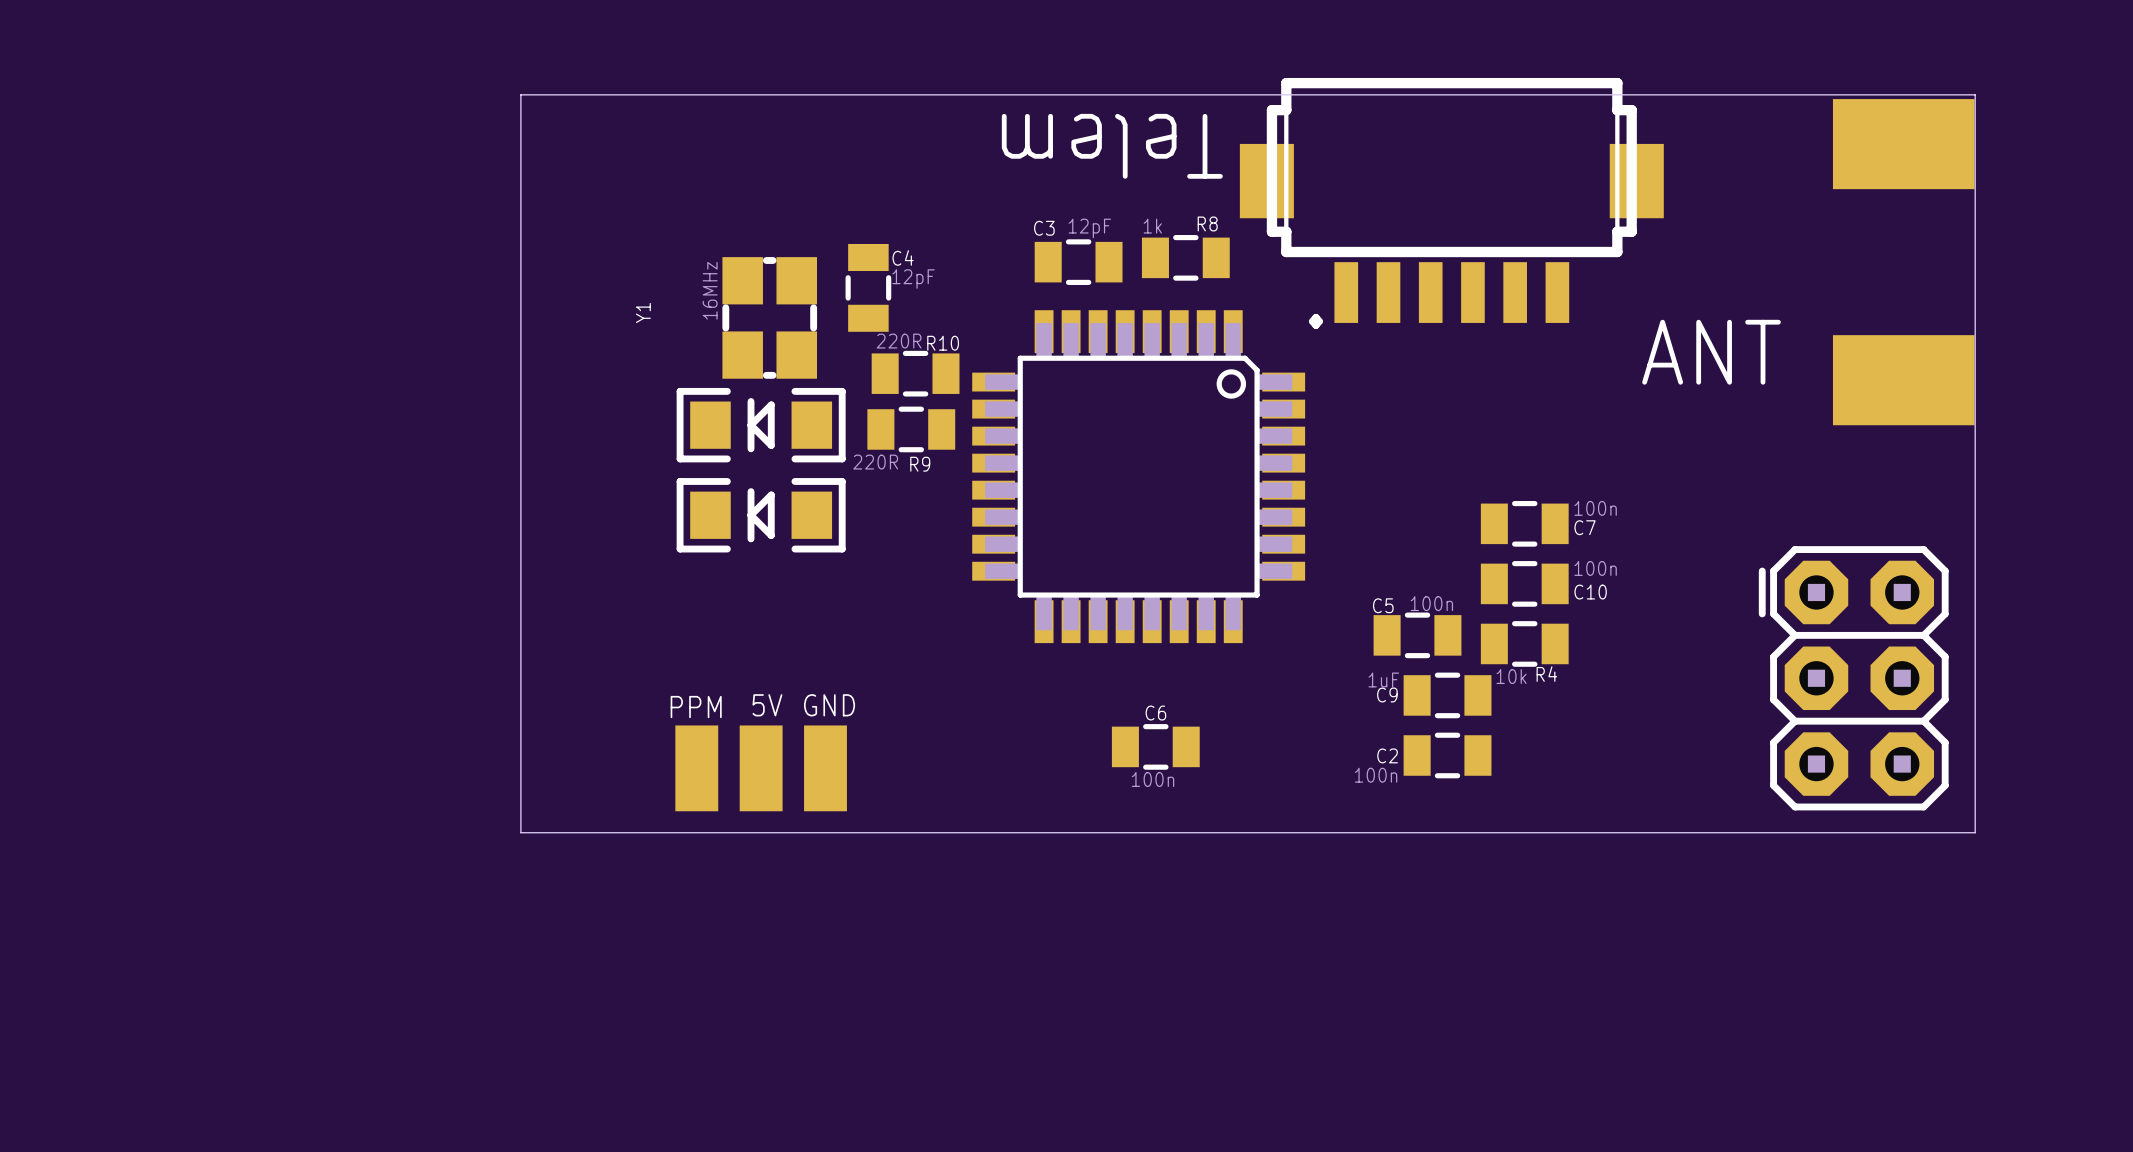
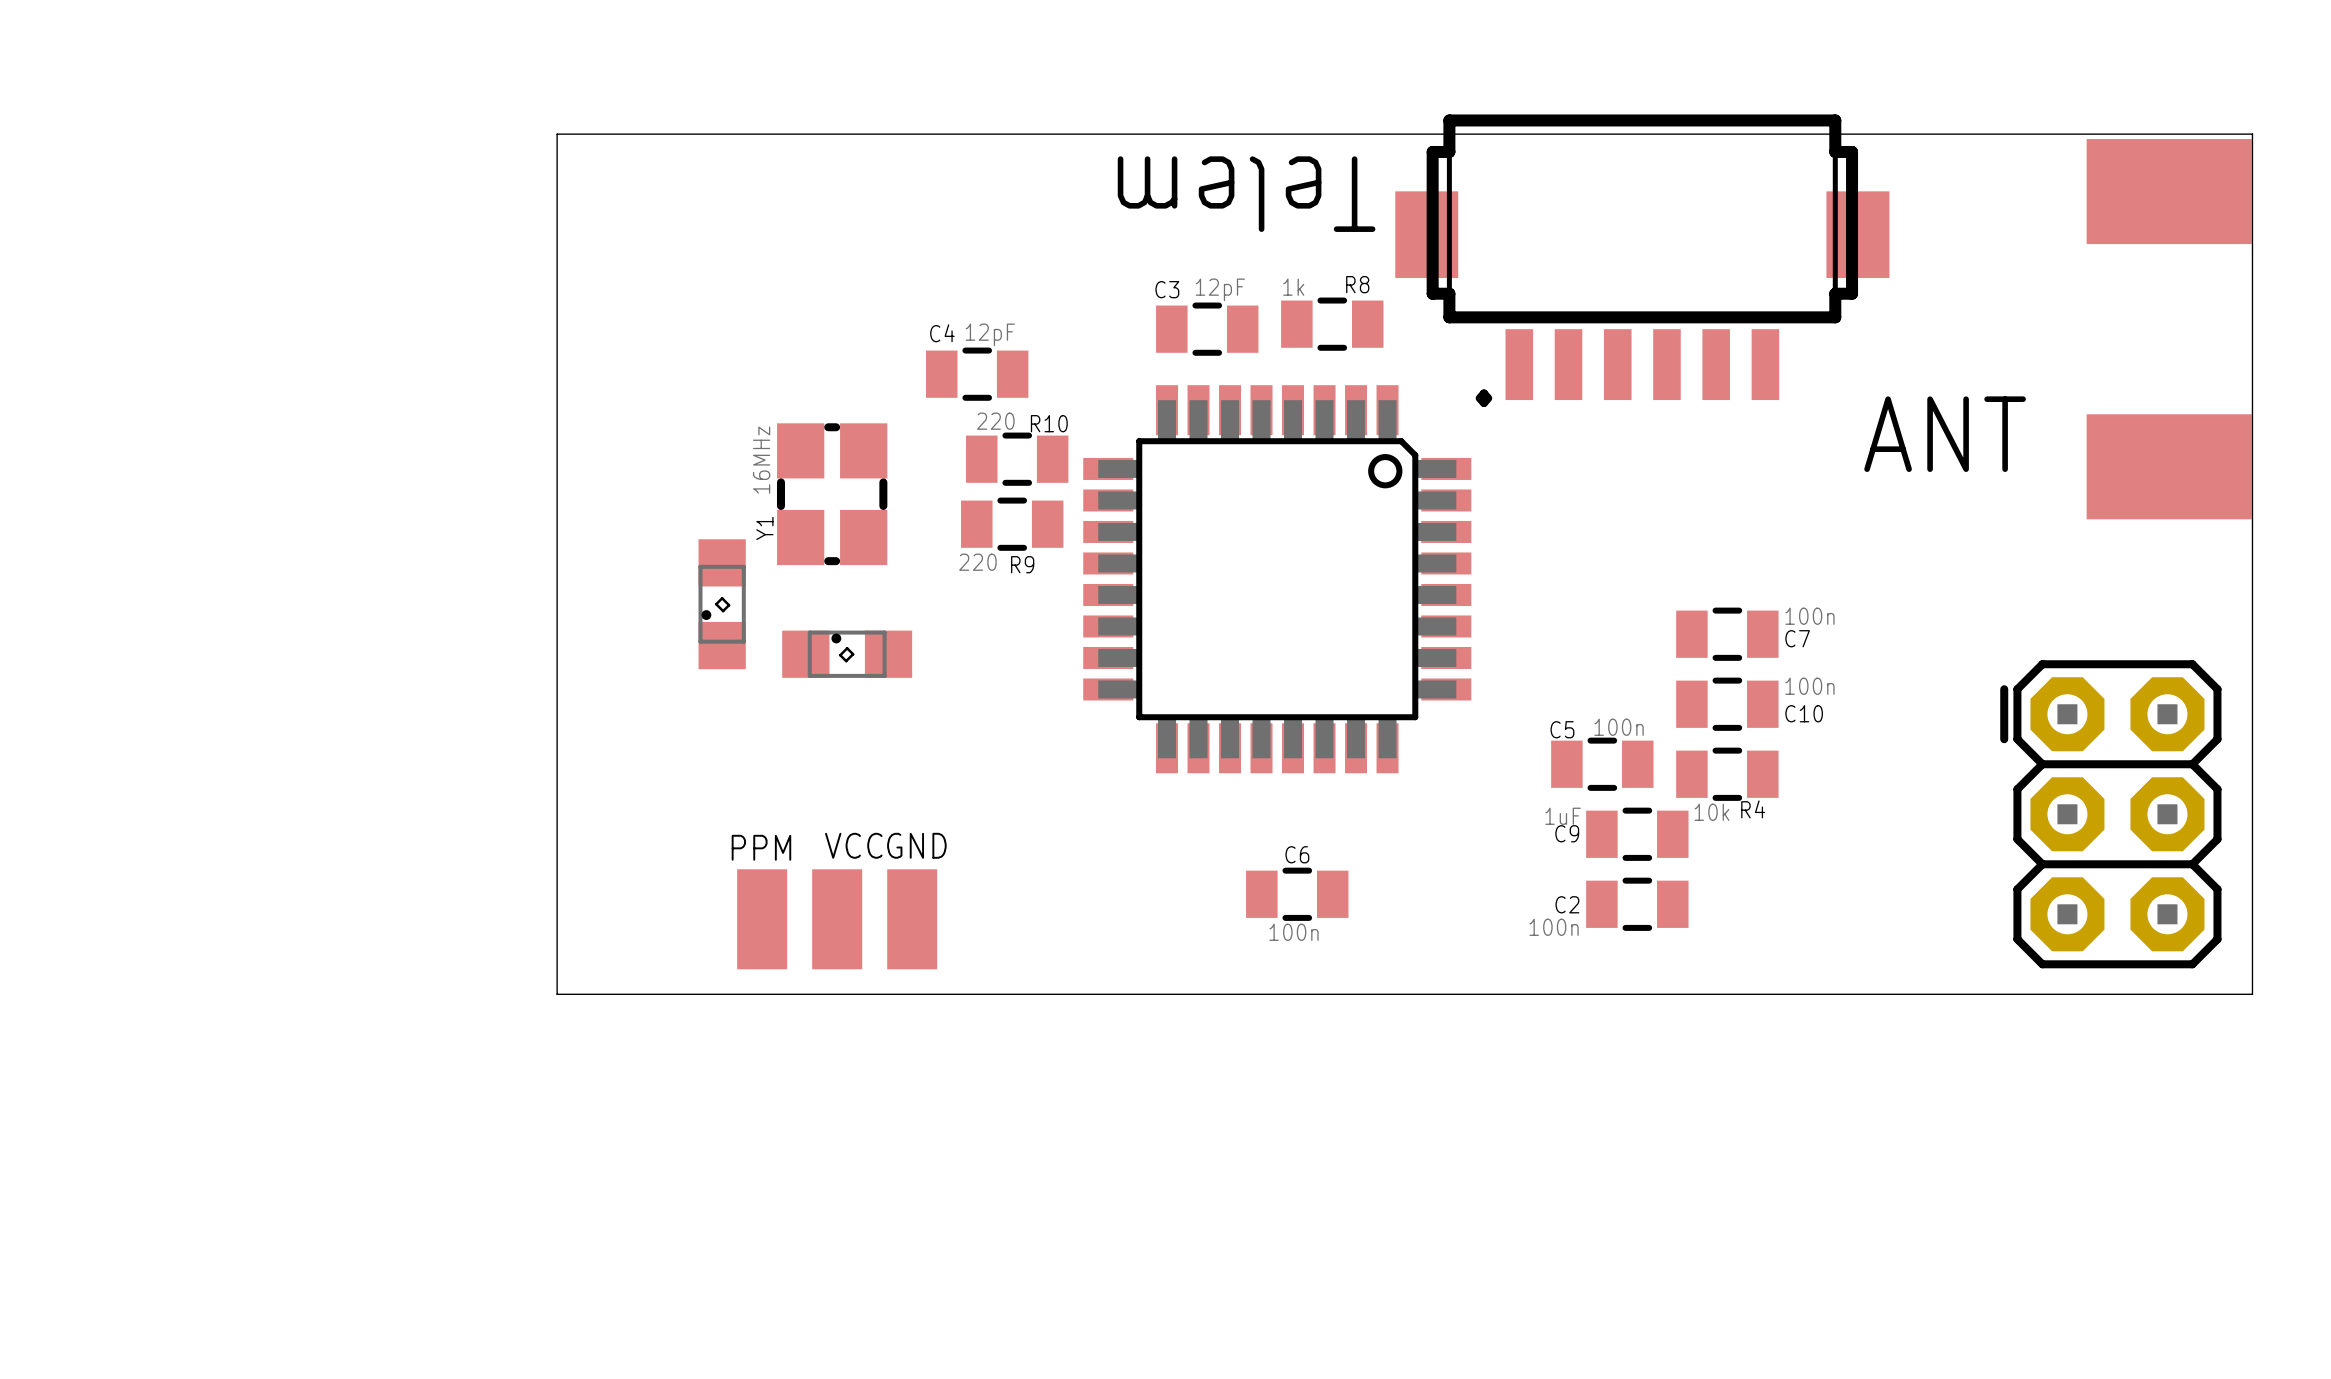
C4 rotation: 0° (868, 287) -> 90° clockwise (977, 374)
Y1 value position: 16MHz (710, 290) -> 16MHz (761, 460)
Y1 name position: Y1 (643, 312) -> Y1 (764, 528)
Y1 position: (769, 317) -> (832, 494)
R10 value: 220R (899, 341) -> 220 (995, 421)
part: (761, 425) -> none
R9 value: 220R (875, 462) -> 220 (977, 562)
part footprint: [676, 478, 846, 553] -> [782, 630, 913, 678]
part: none -> (722, 604)
5V name: 5V (767, 705) -> VCC (853, 845)

